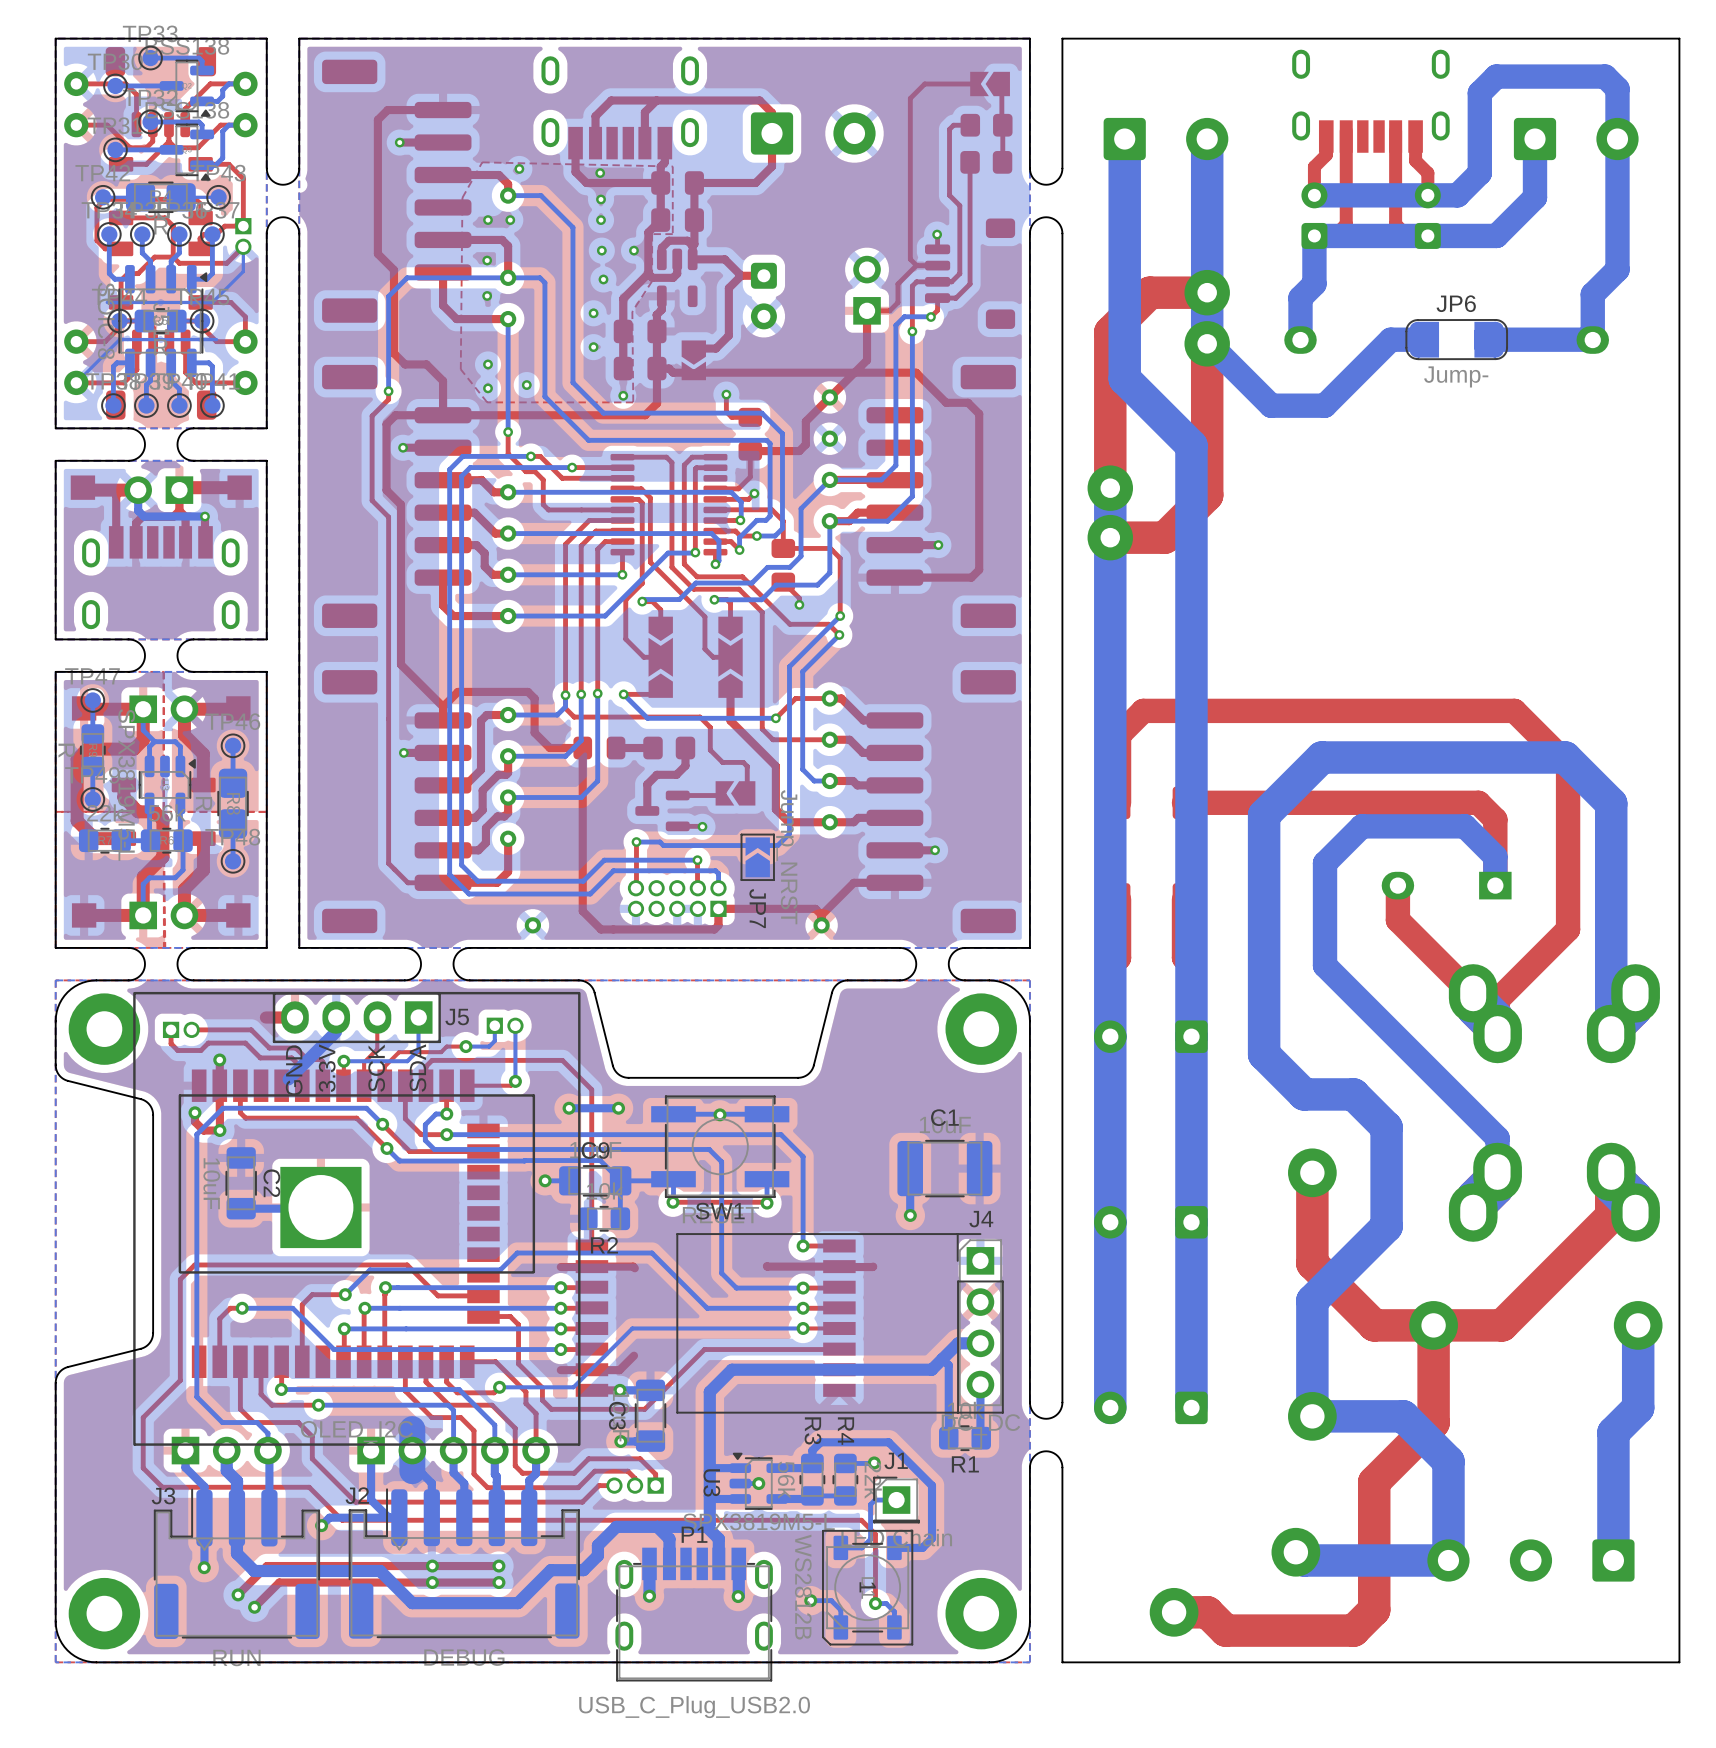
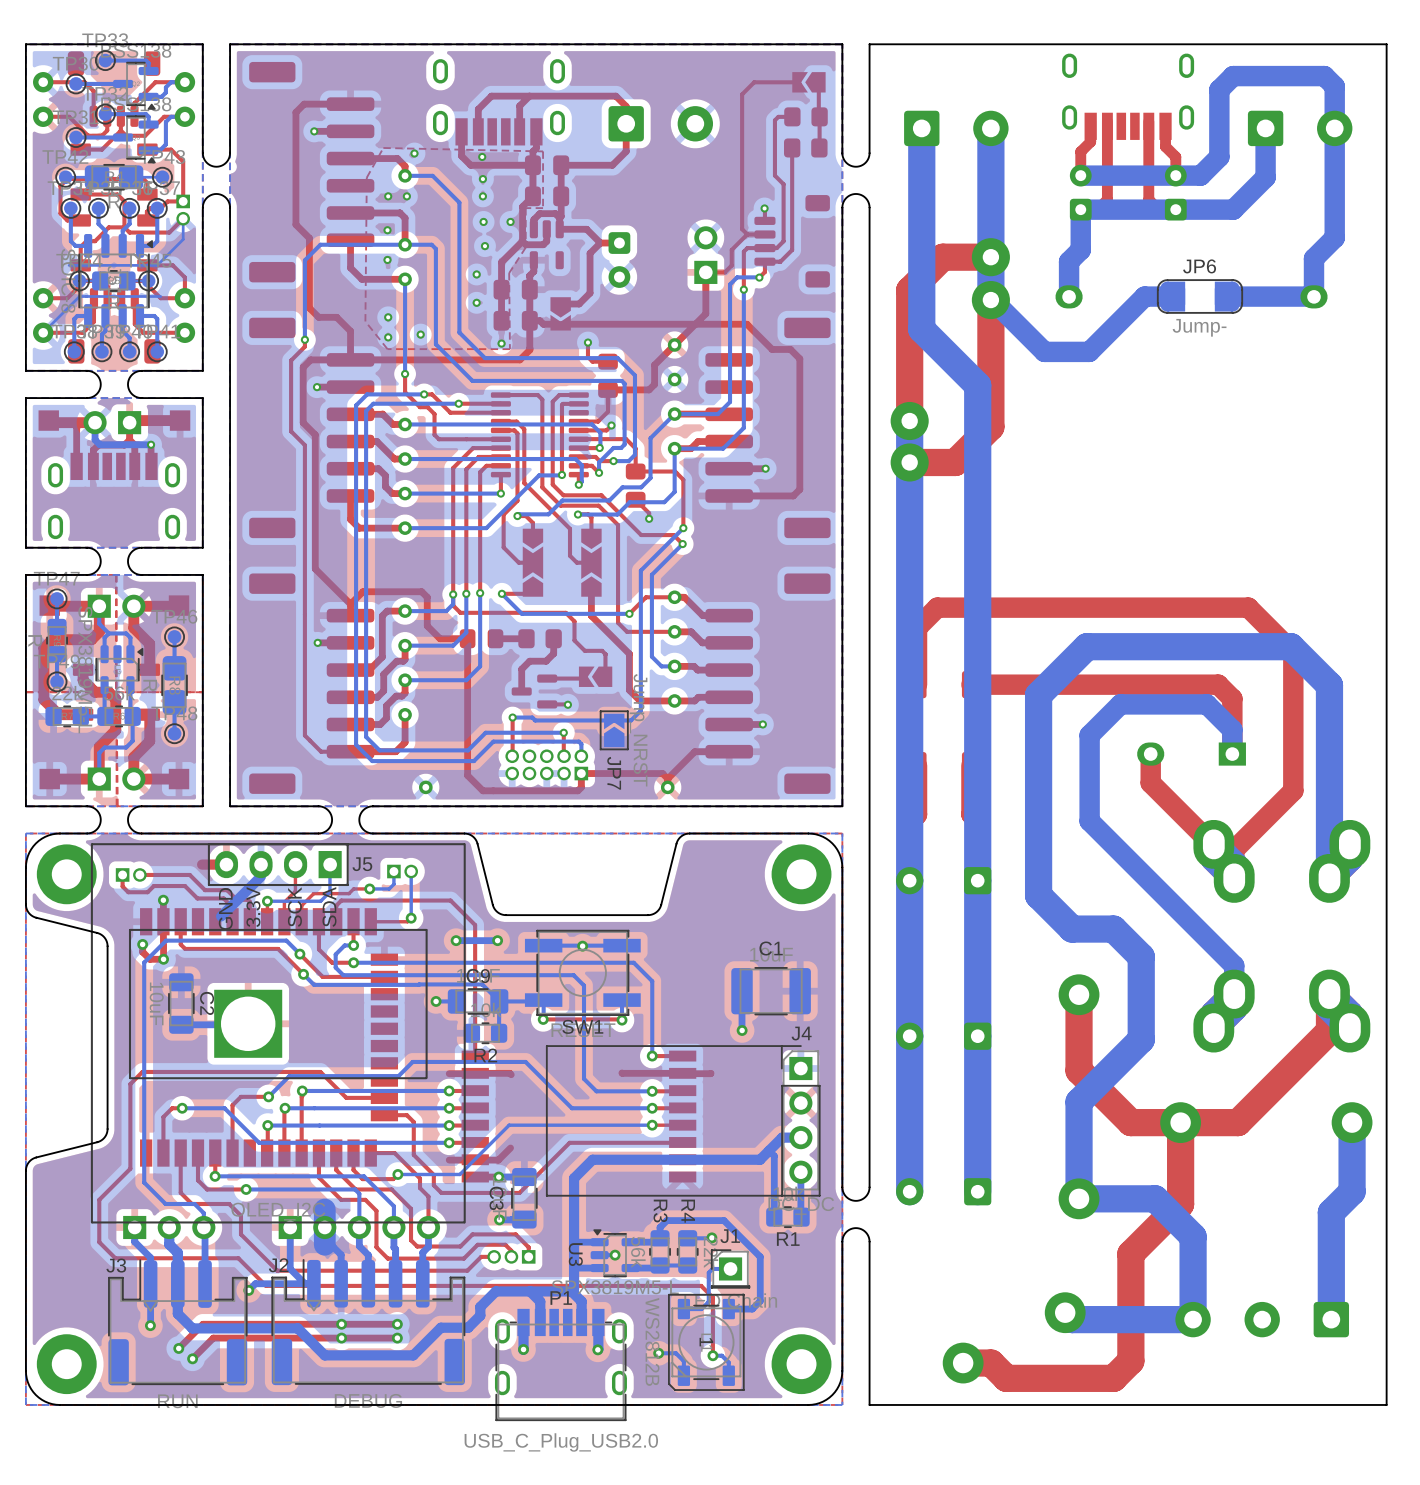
board edge: (900, 947) (911, 952) (916, 964) (911, 975) (900, 980) -> (787, 833) (733, 833)
board edge: (964, 947) (953, 952) (948, 964) (953, 975) (964, 980) -> (787, 806) (733, 806)

